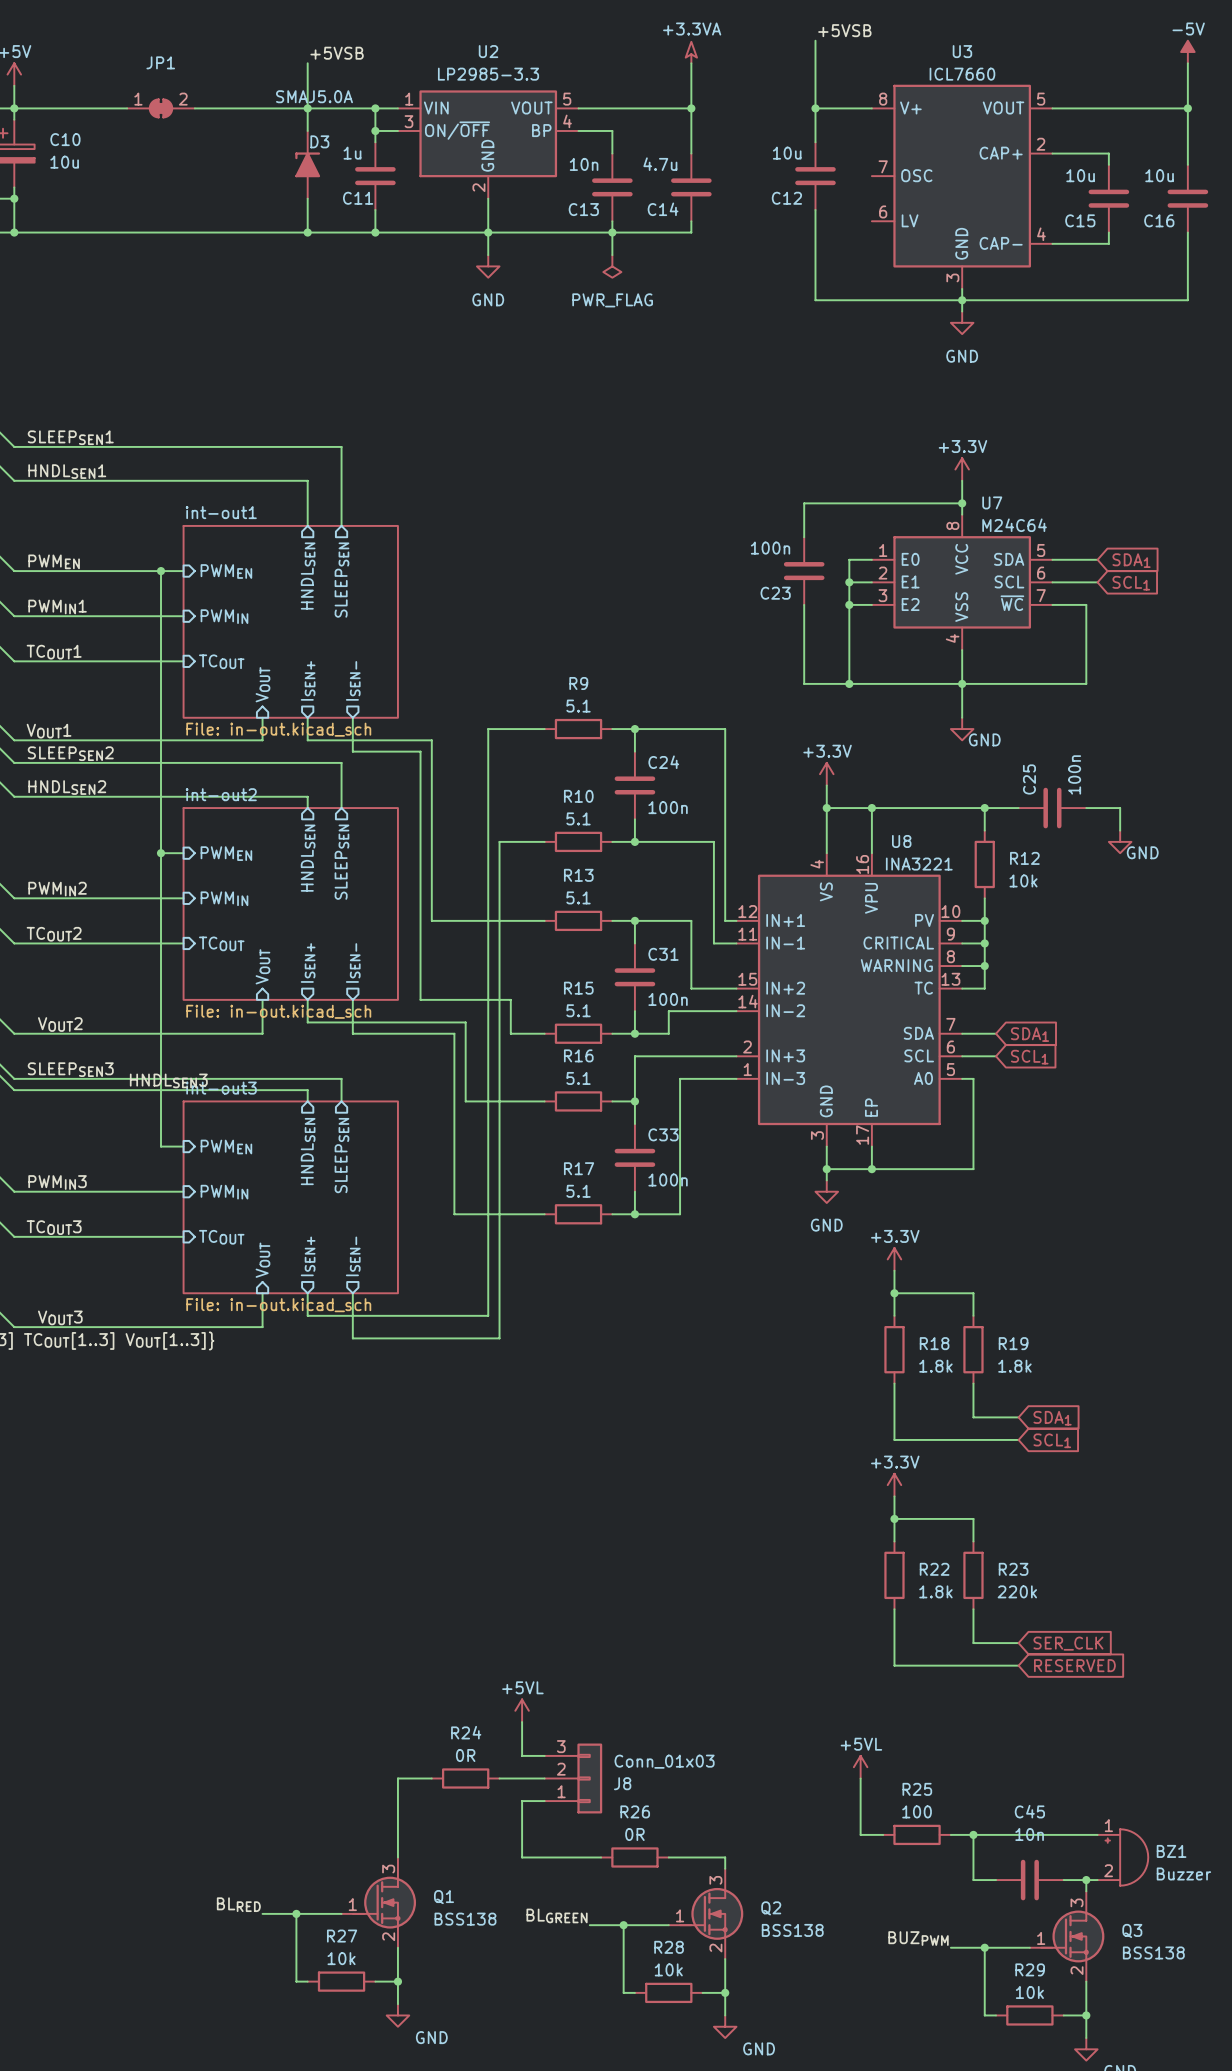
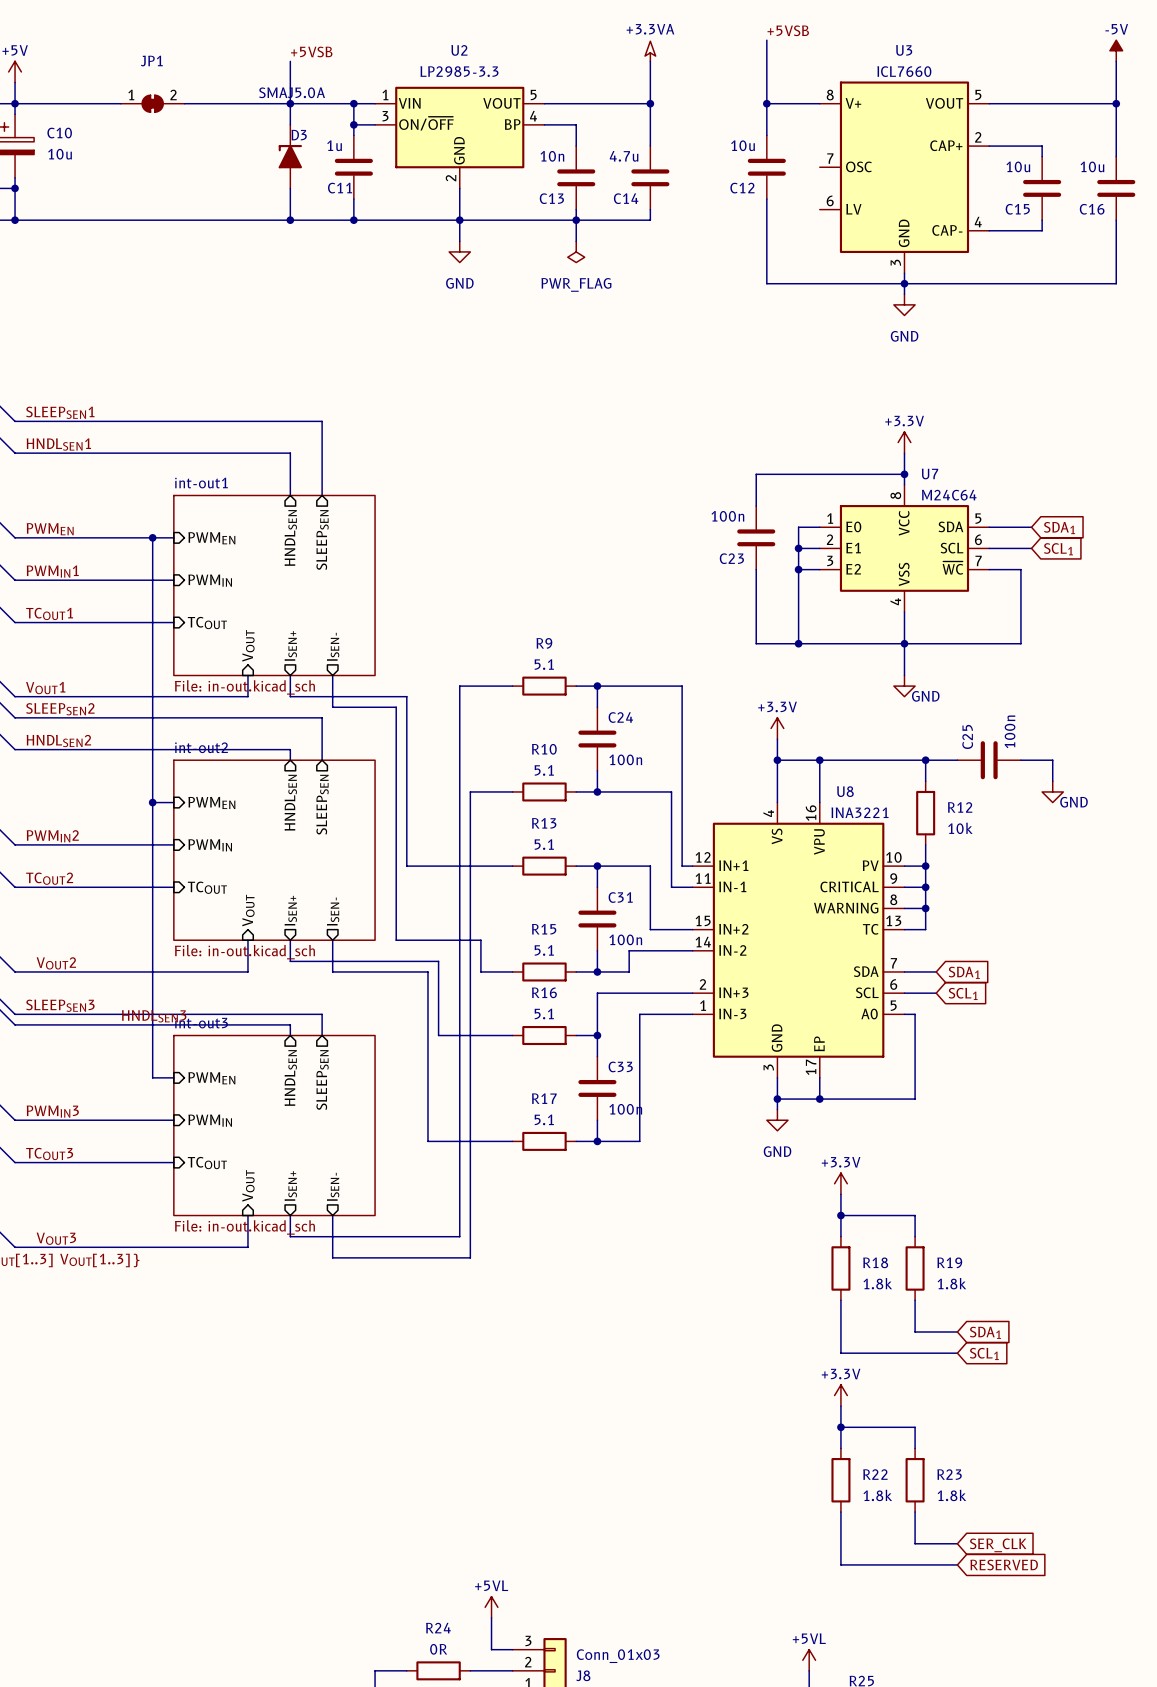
R23 value: 220k (1017, 1591) -> 1.8k (951, 1495)

